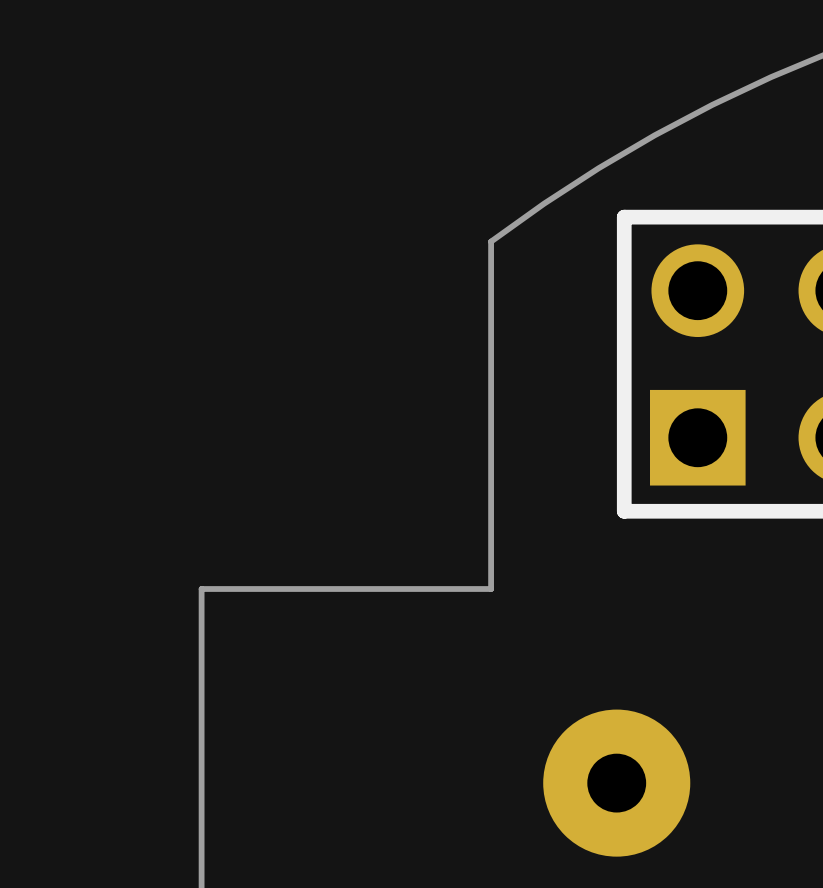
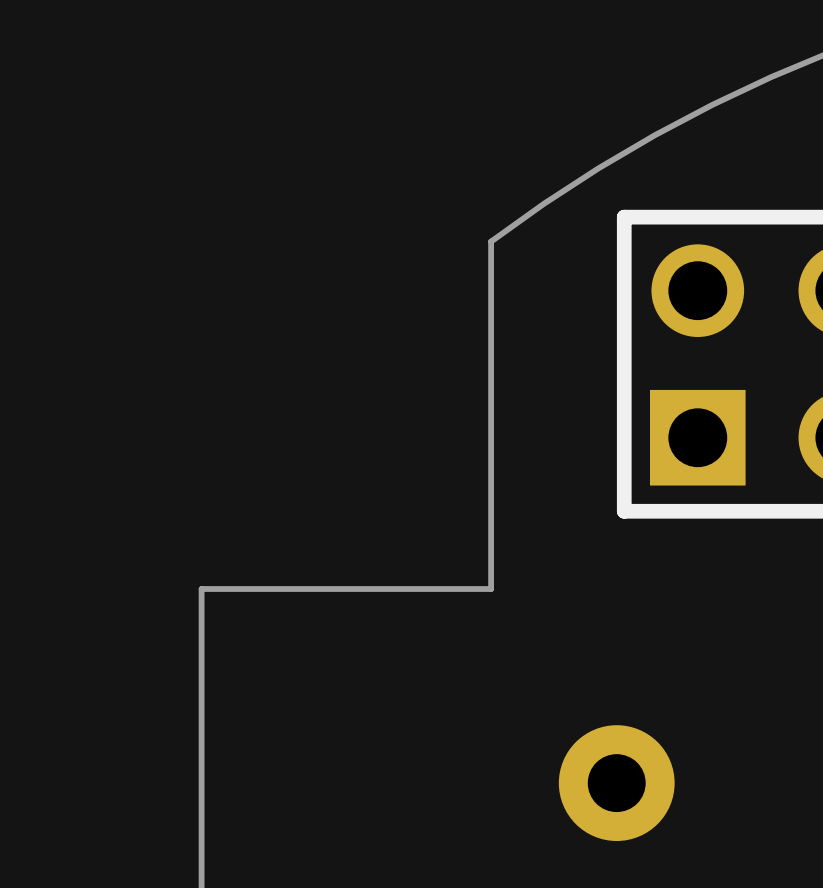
part footprint: [543, 709, 691, 857] -> [558, 725, 675, 842]

